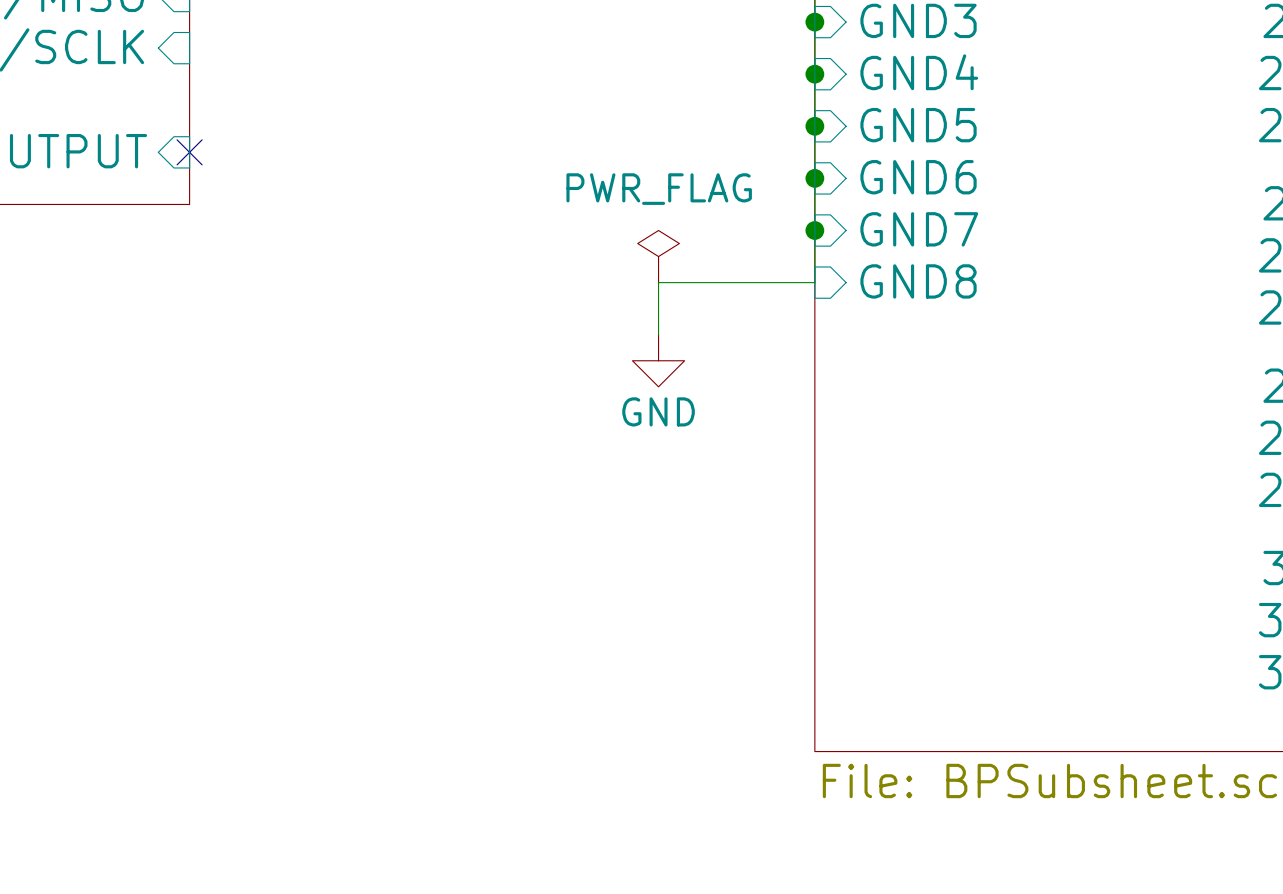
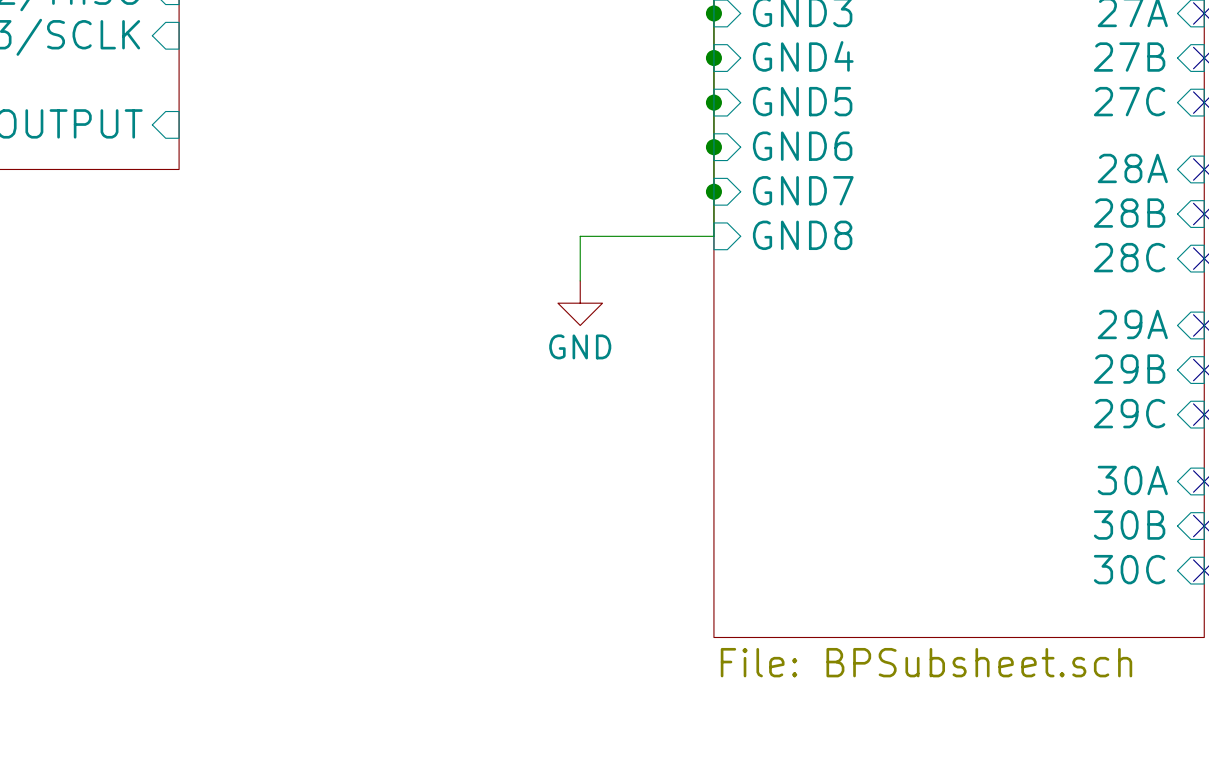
no-connect mark: (189, 152) -> none
power symbol: PWR_FLAG (658, 256) -> none

